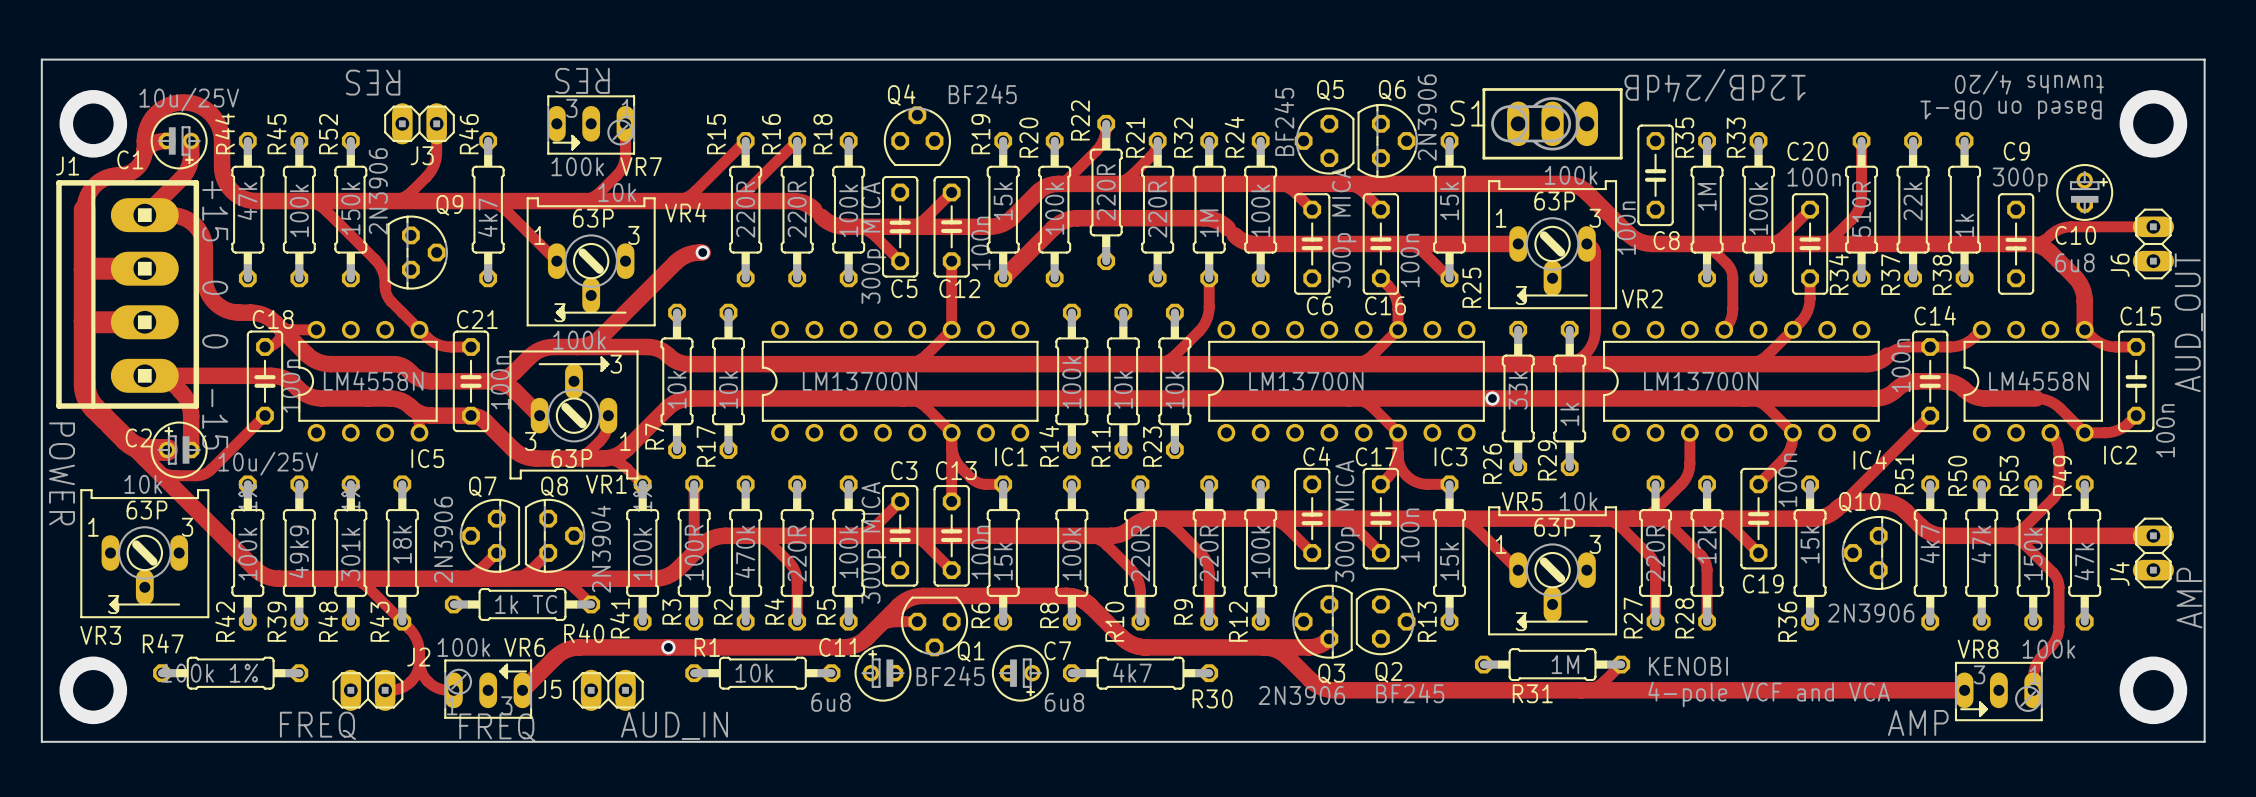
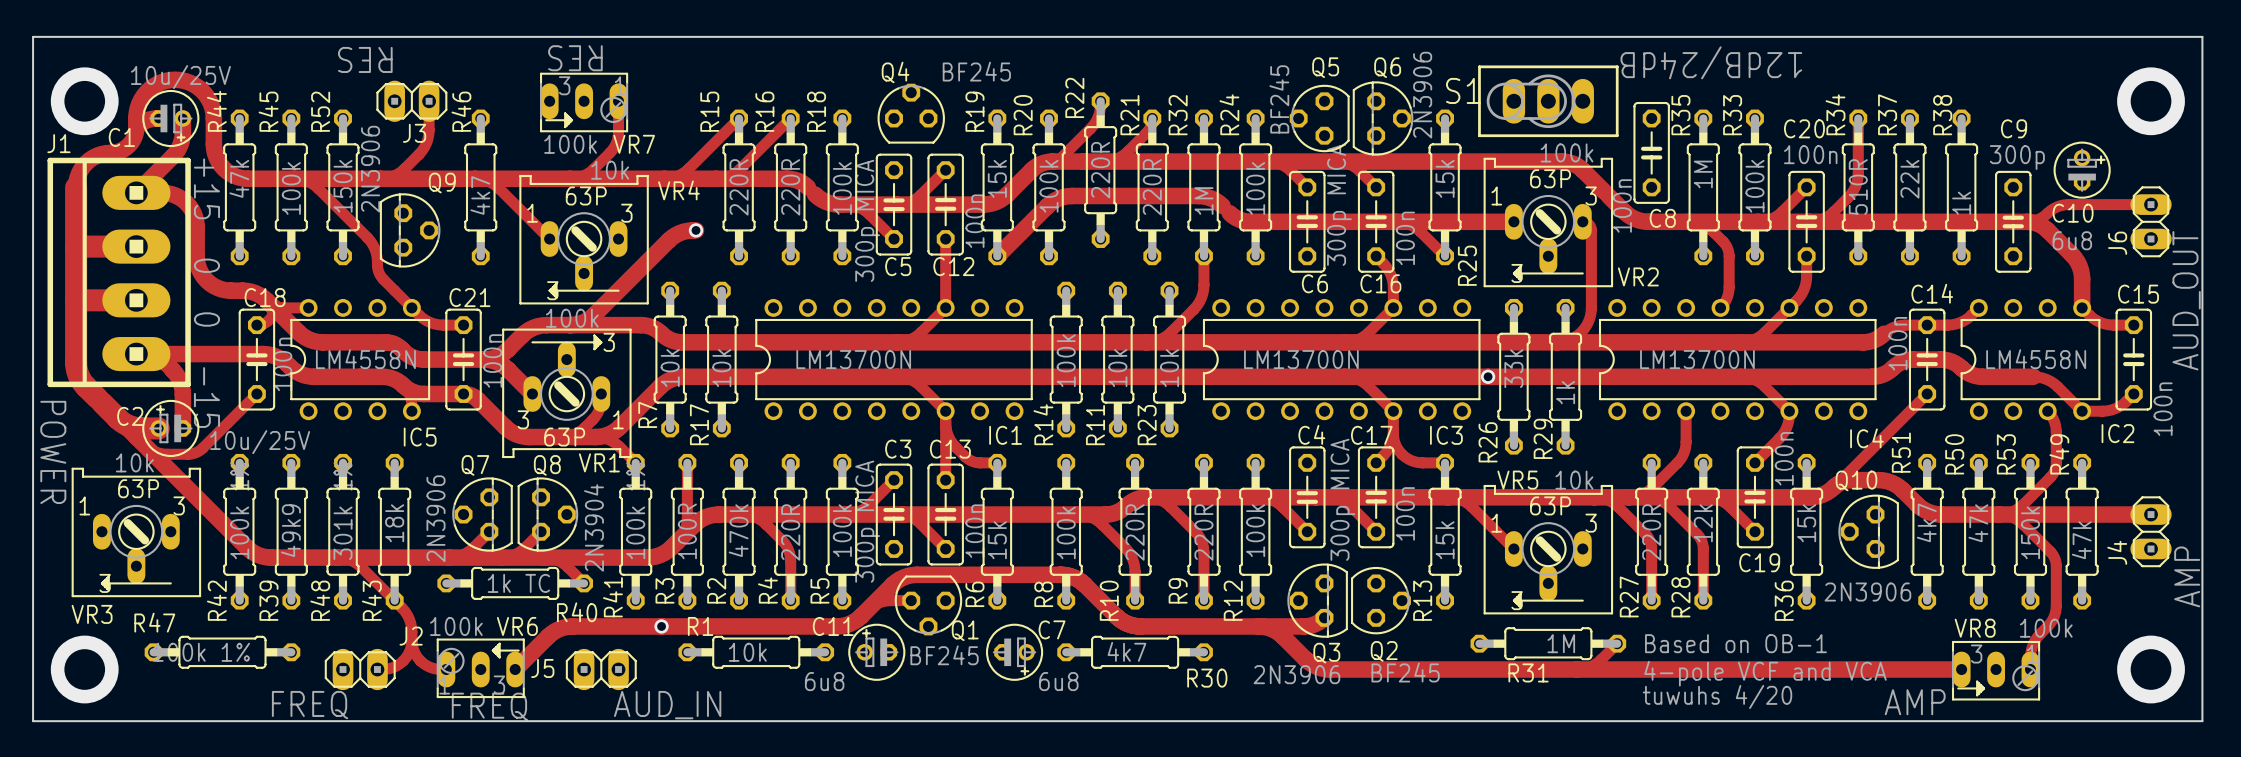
text: tuwuhs 4/20 (2029, 82) -> none
text: Based on OB-1 (2010, 110) -> none
R34 name position: R34 (1838, 274) -> R34 (1835, 114)
R37 name position: R37 (1890, 274) -> R37 (1887, 114)
R38 name position: R38 (1942, 274) -> R38 (1942, 115)
text: KENOBI (1688, 666) -> Based on OB-1 (1735, 643)
text: none -> tuwuhs 4/20 (1717, 696)

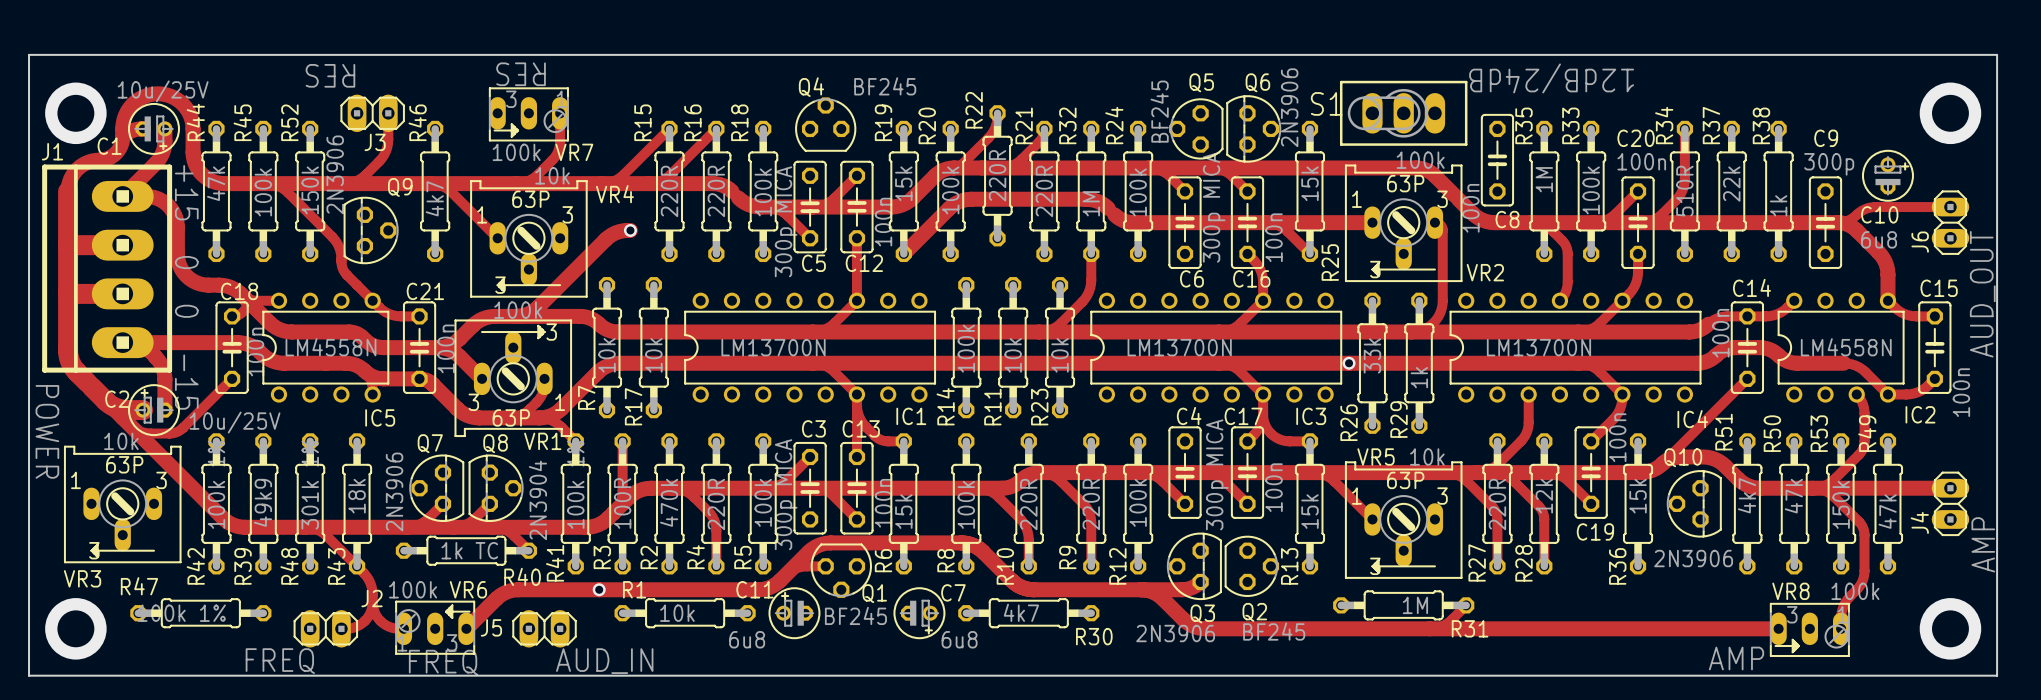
text: Based on OB-1 (1735, 643) -> none
R31 name position: R31 (1528, 672) -> R31 (1470, 628)
text: 4-pole VCF and VCA (1765, 673) -> none
text: tuwuhs 4/20 (1717, 696) -> none

